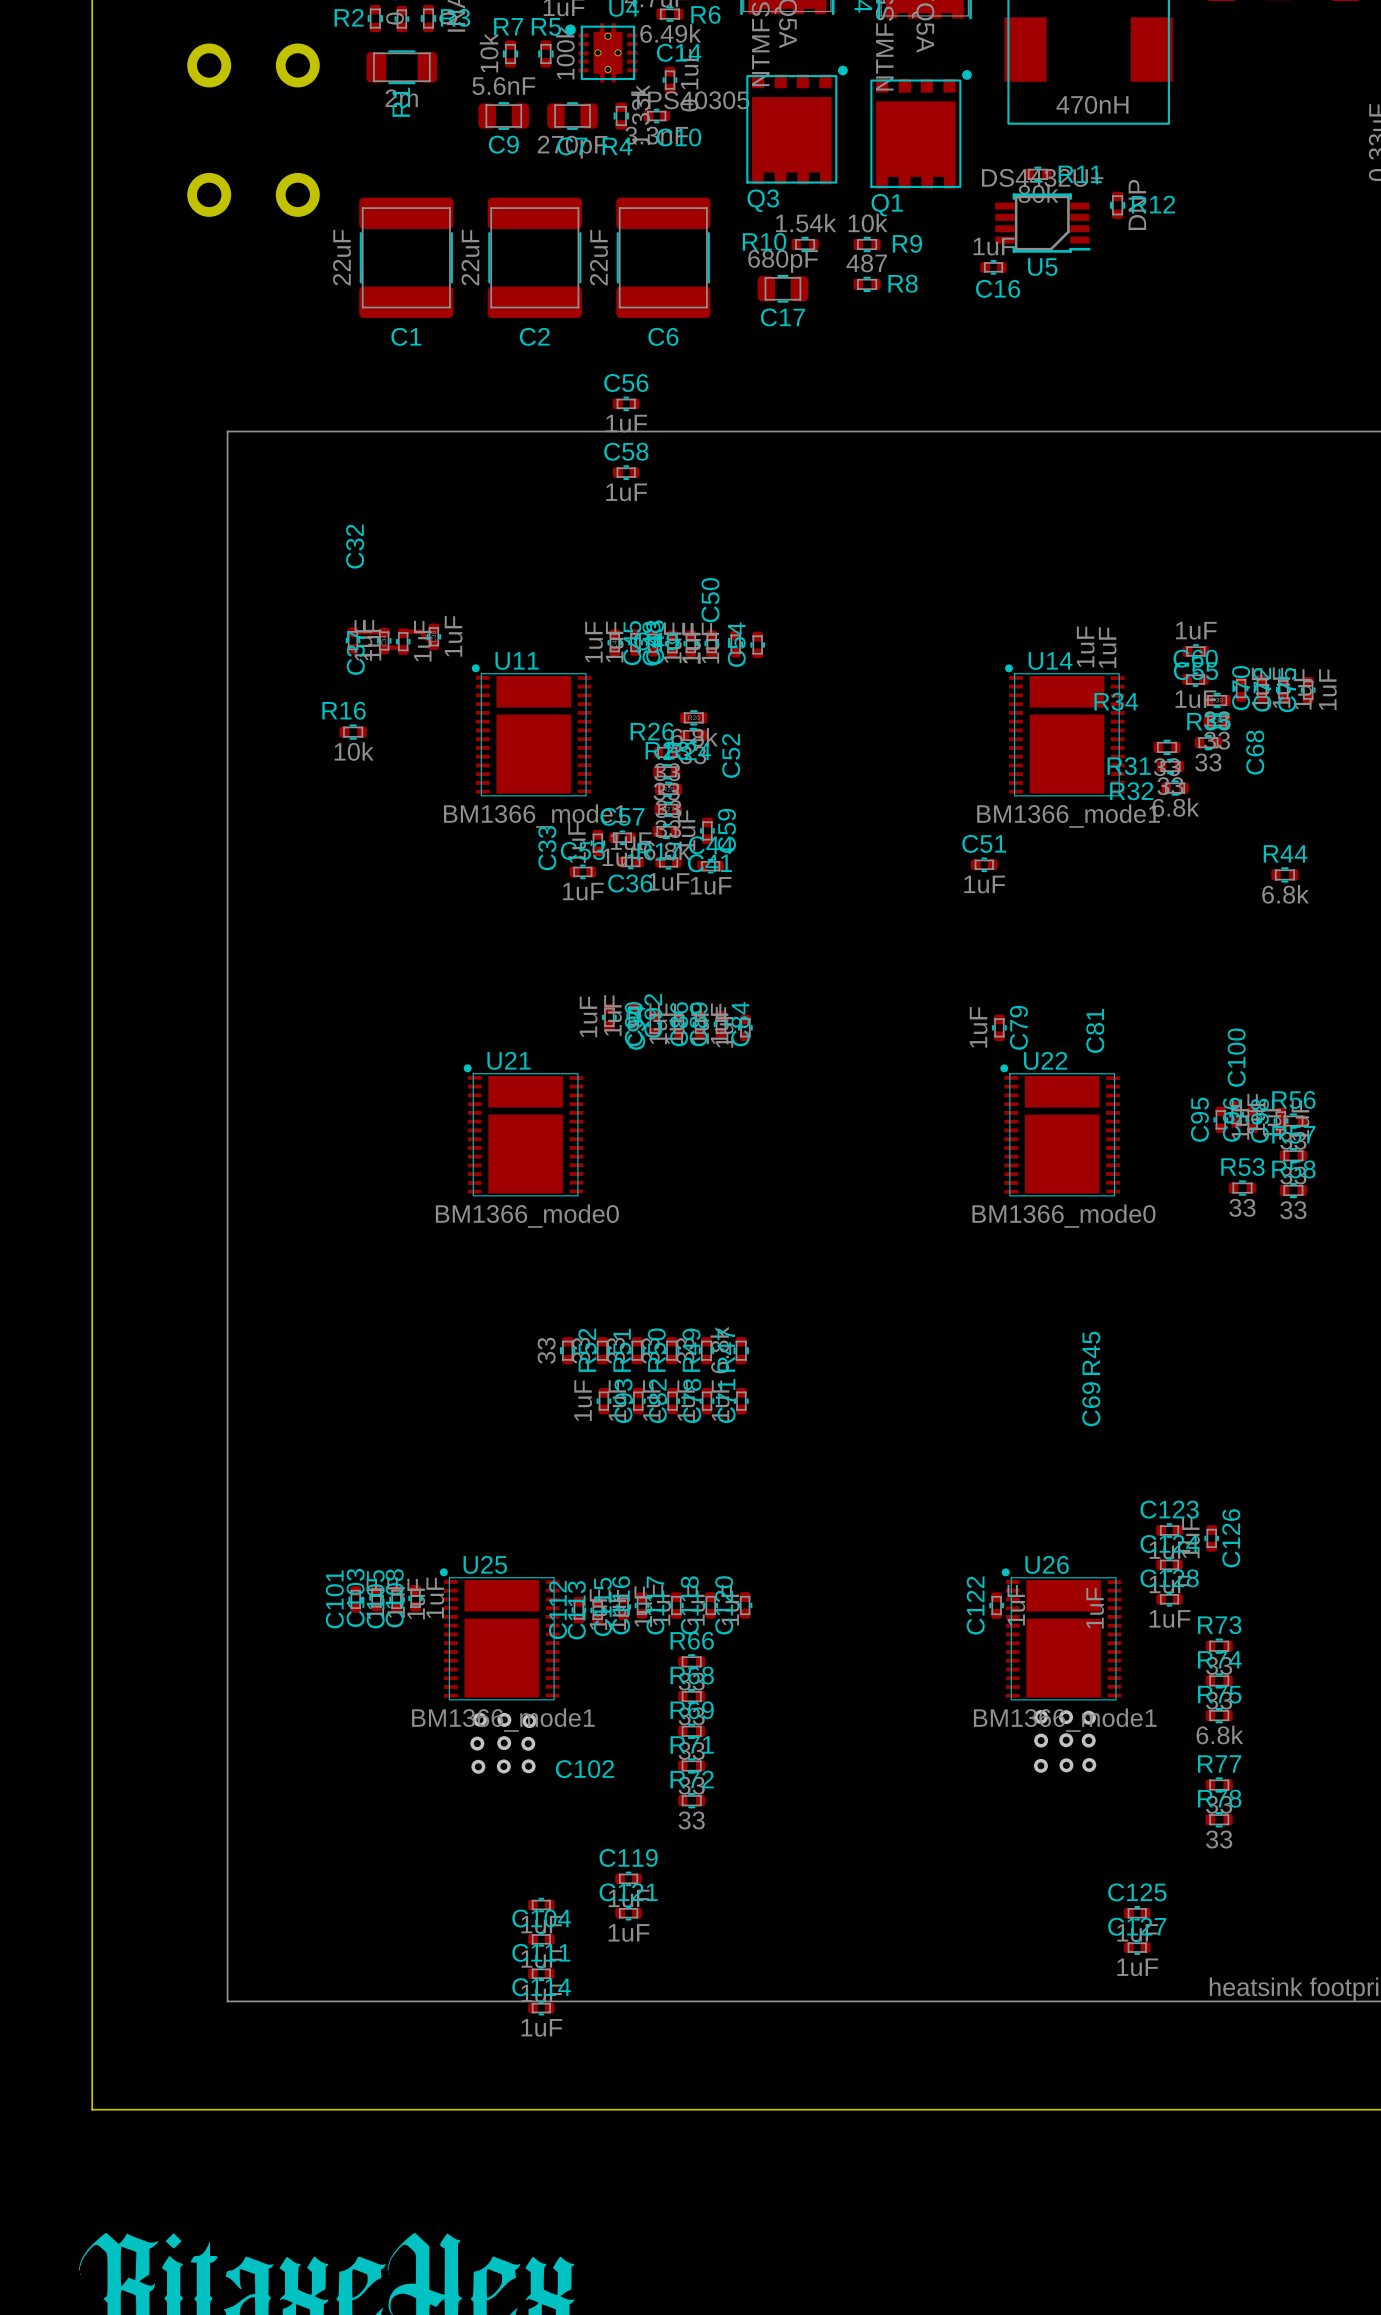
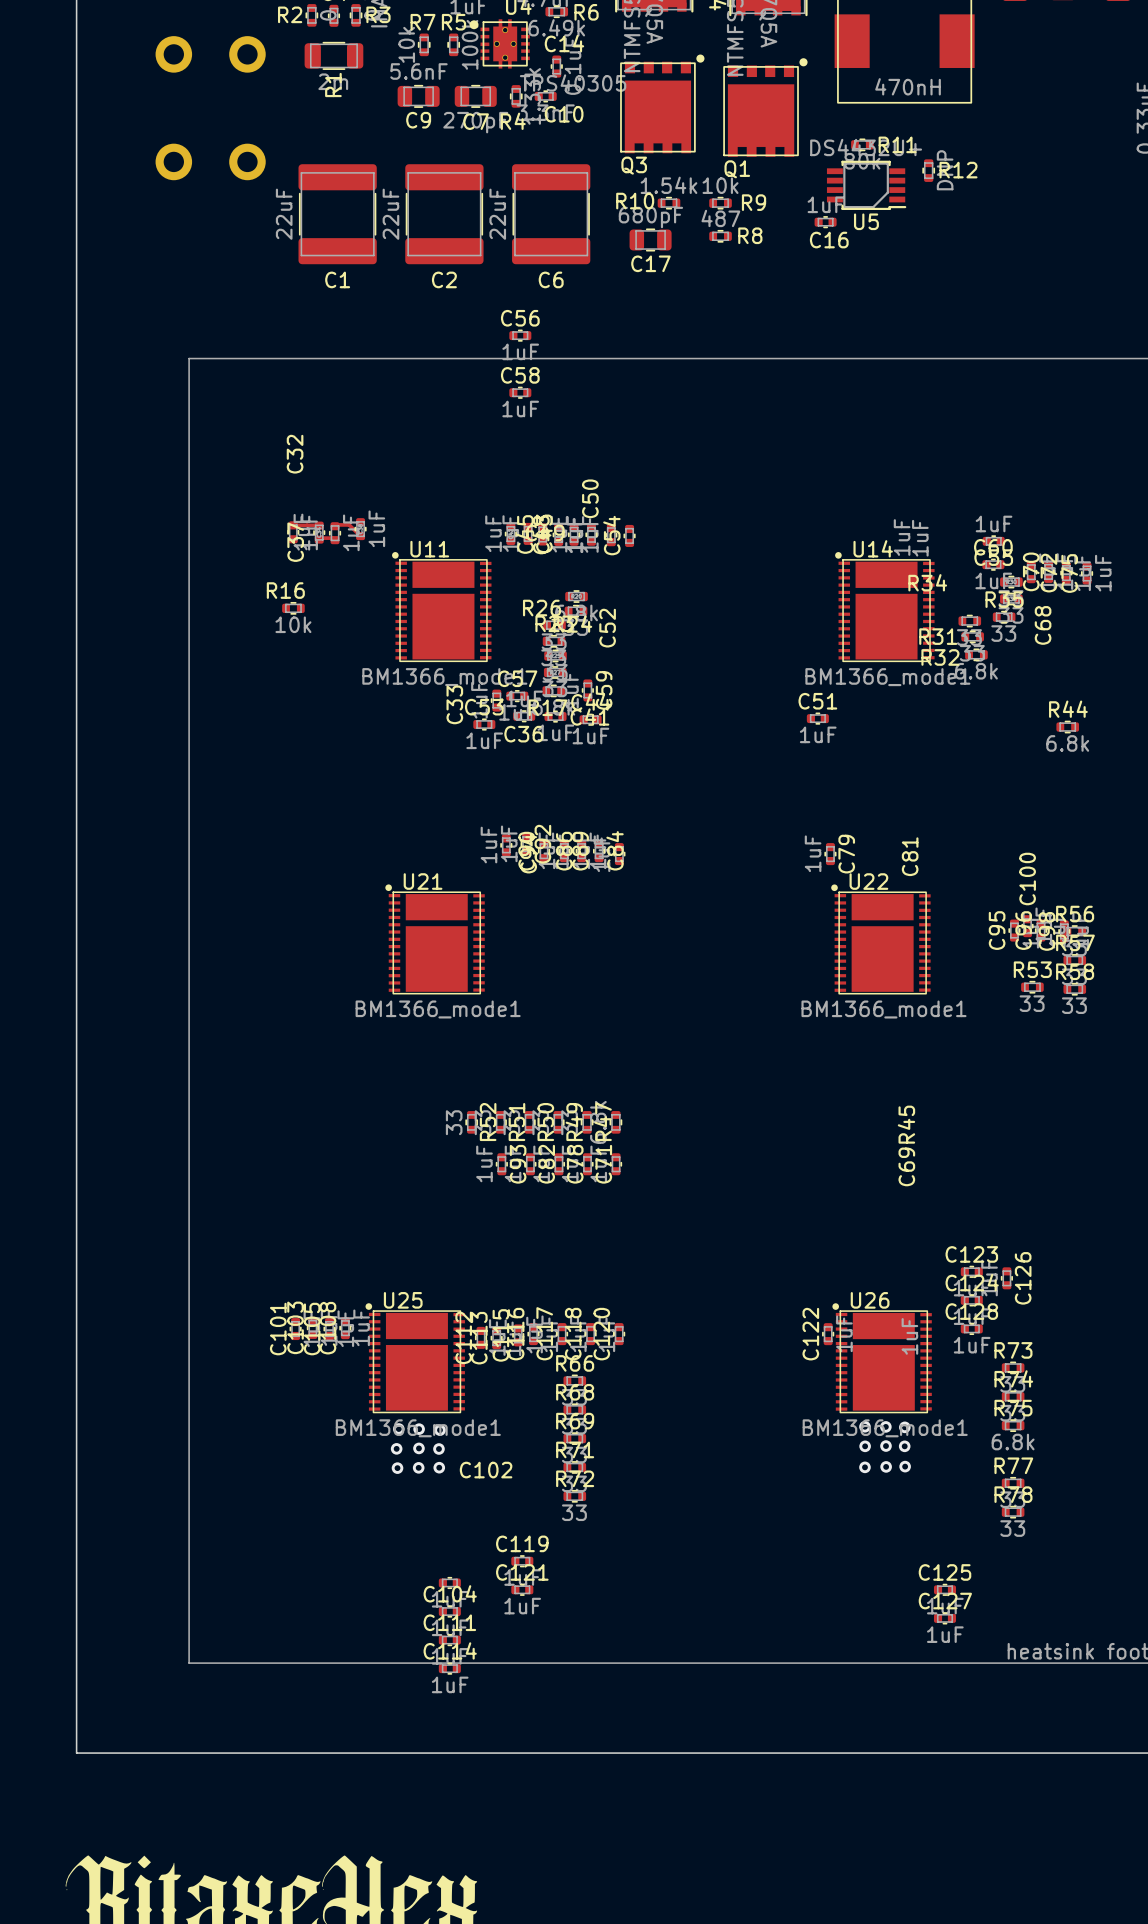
U21 value: BM1366_mode0 (527, 1216) -> BM1366_mode1 (438, 1009)
U22 value: BM1366_mode0 (1063, 1216) -> BM1366_mode1 (883, 1009)

